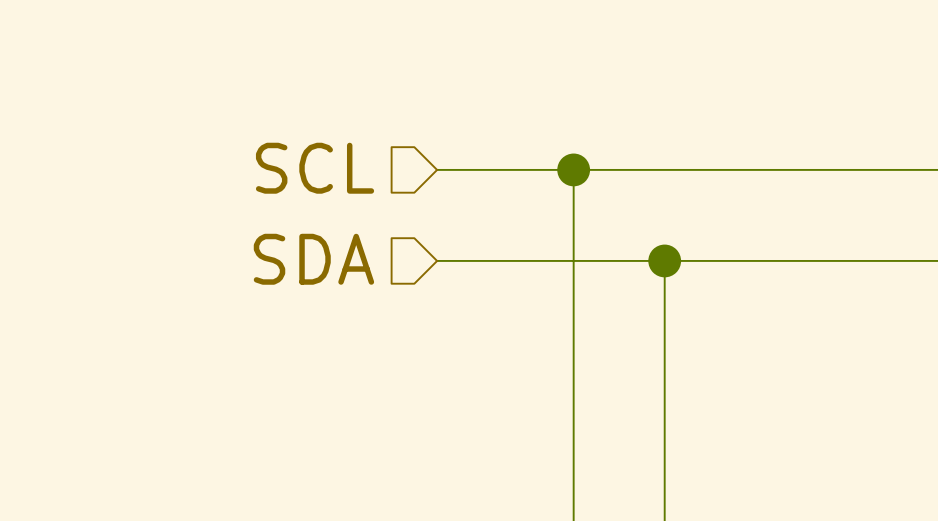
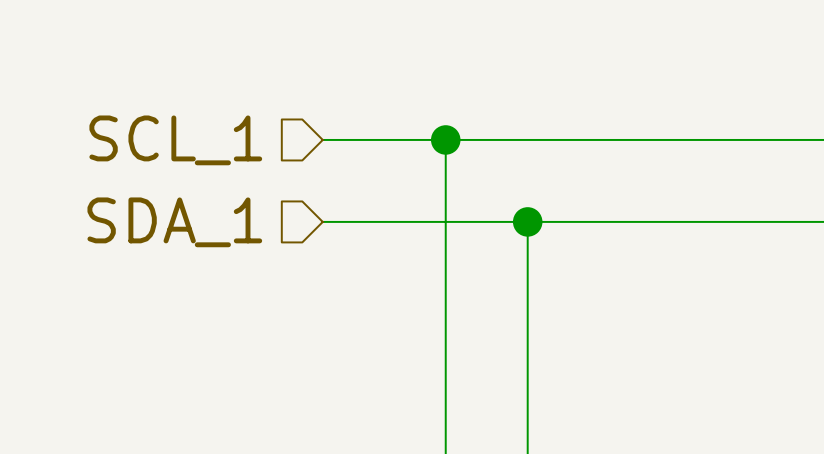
hierarchical label: SCL (315, 168) -> SCL_1 (175, 140)
hierarchical label: SDA (313, 259) -> SDA_1 (174, 222)

